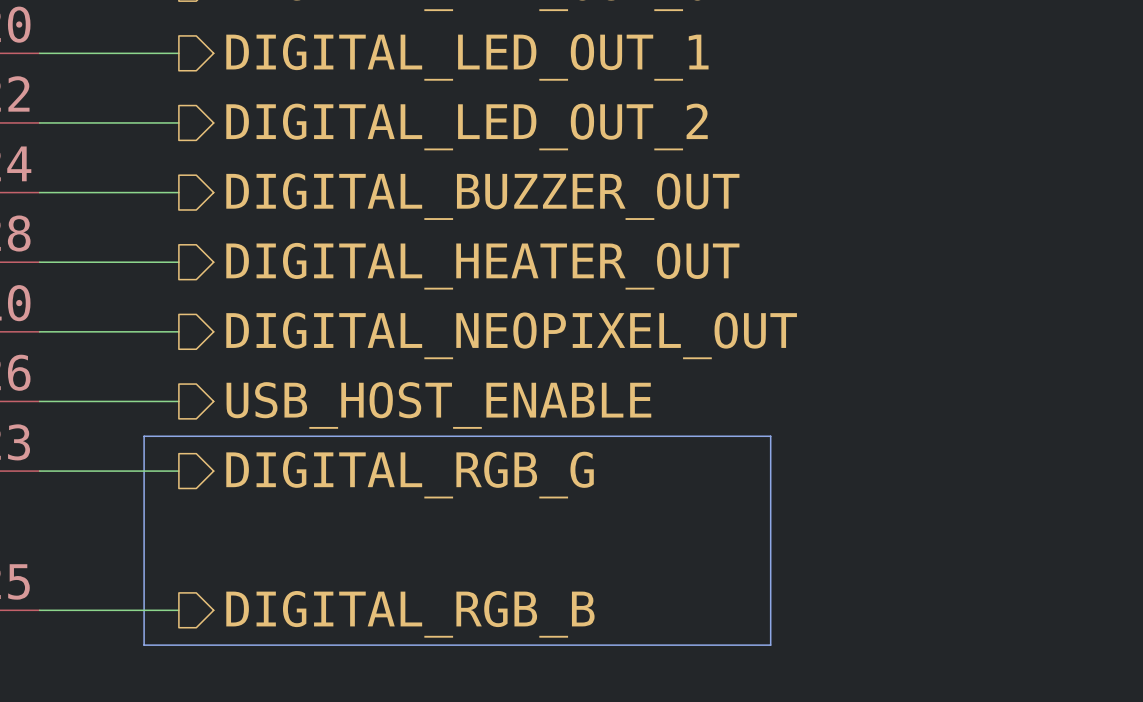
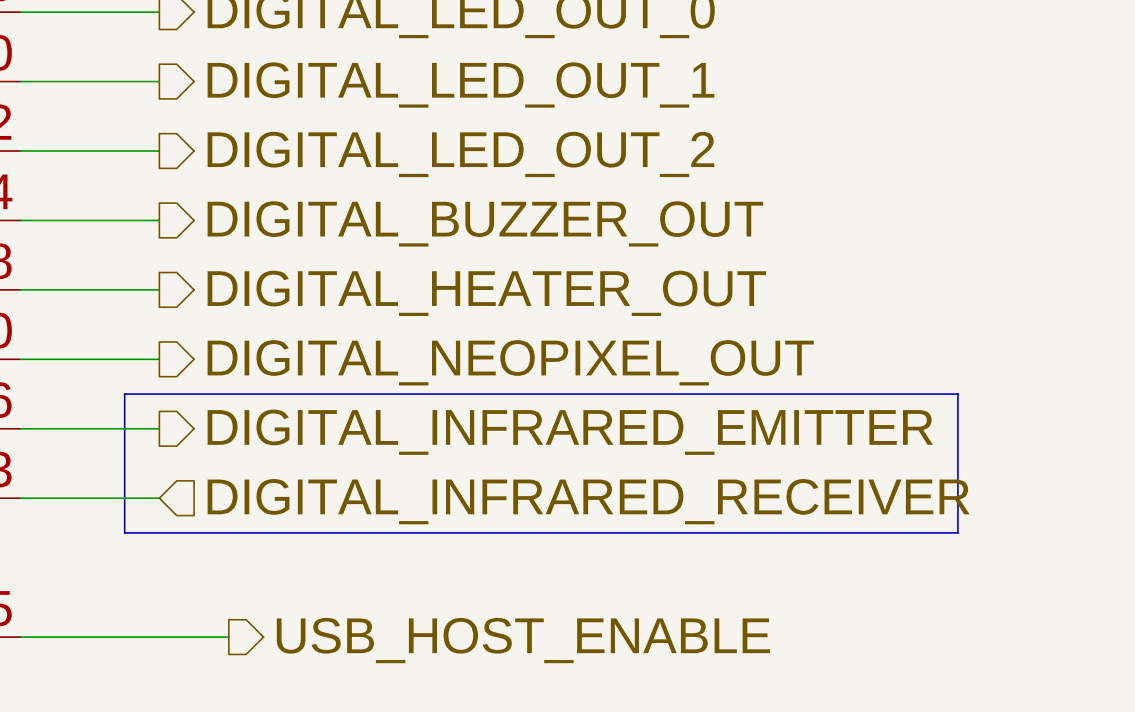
hierarchical label: USB_HOST_ENABLE (438, 405) -> DIGITAL_INFRARED_EMITTER (570, 432)
line: (144, 436) (770, 436) (770, 645) (144, 645) (144, 505) -> (124, 463) (124, 394) (957, 394) (957, 532) (124, 532)
hierarchical label shape: output (410, 475) -> input (588, 501)
hierarchical label: DIGITAL_RGB_G (410, 475) -> DIGITAL_INFRARED_RECEIVER (588, 501)
wire: none -> (159, 637) (228, 637)
hierarchical label: DIGITAL_RGB_B (410, 614) -> none
hierarchical label: none -> USB_HOST_ENABLE (523, 640)

